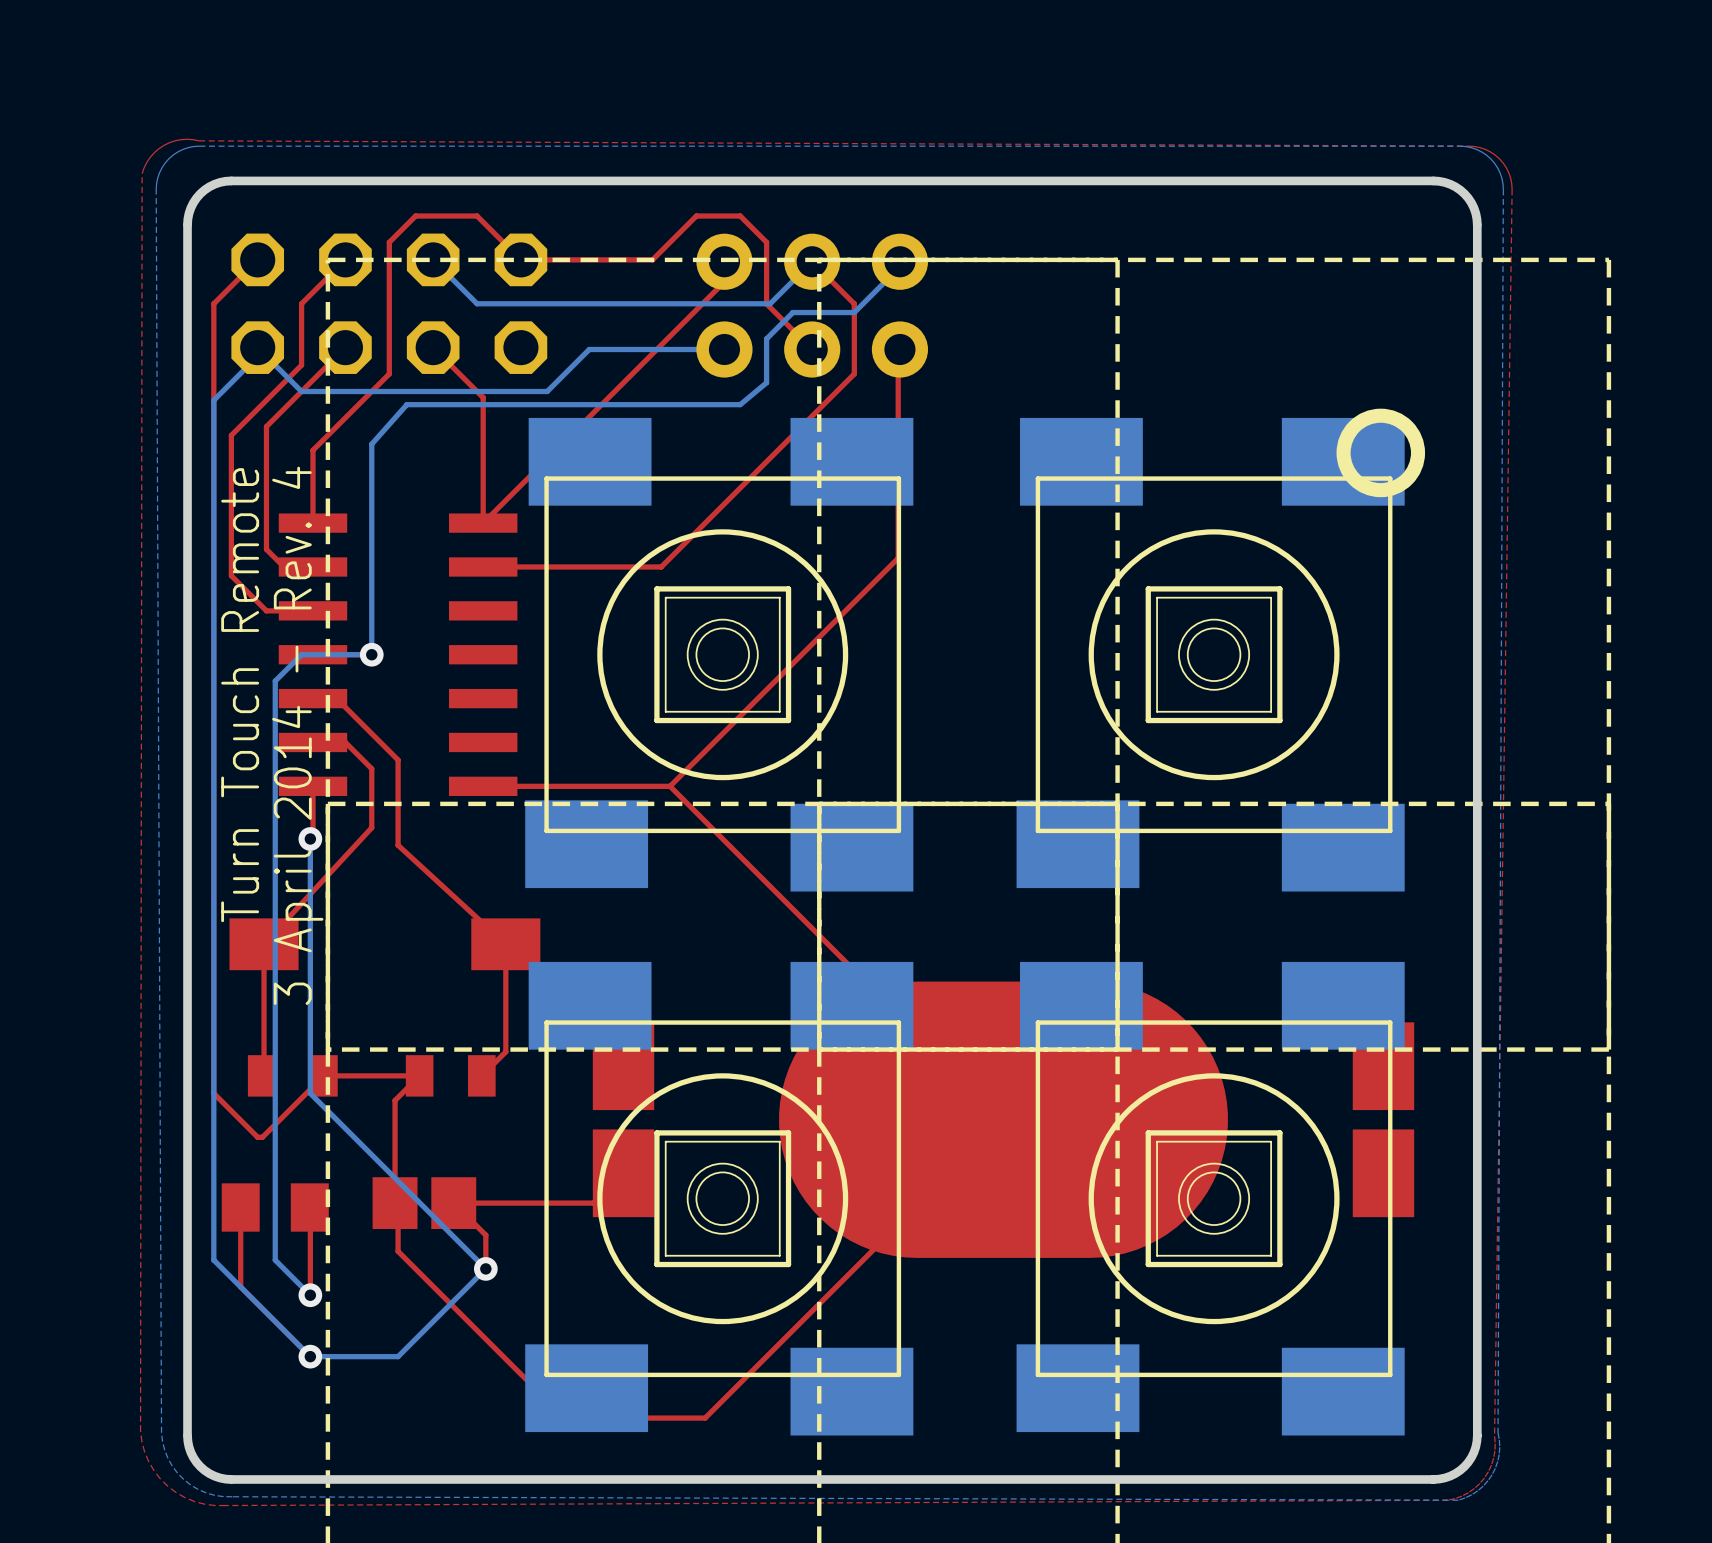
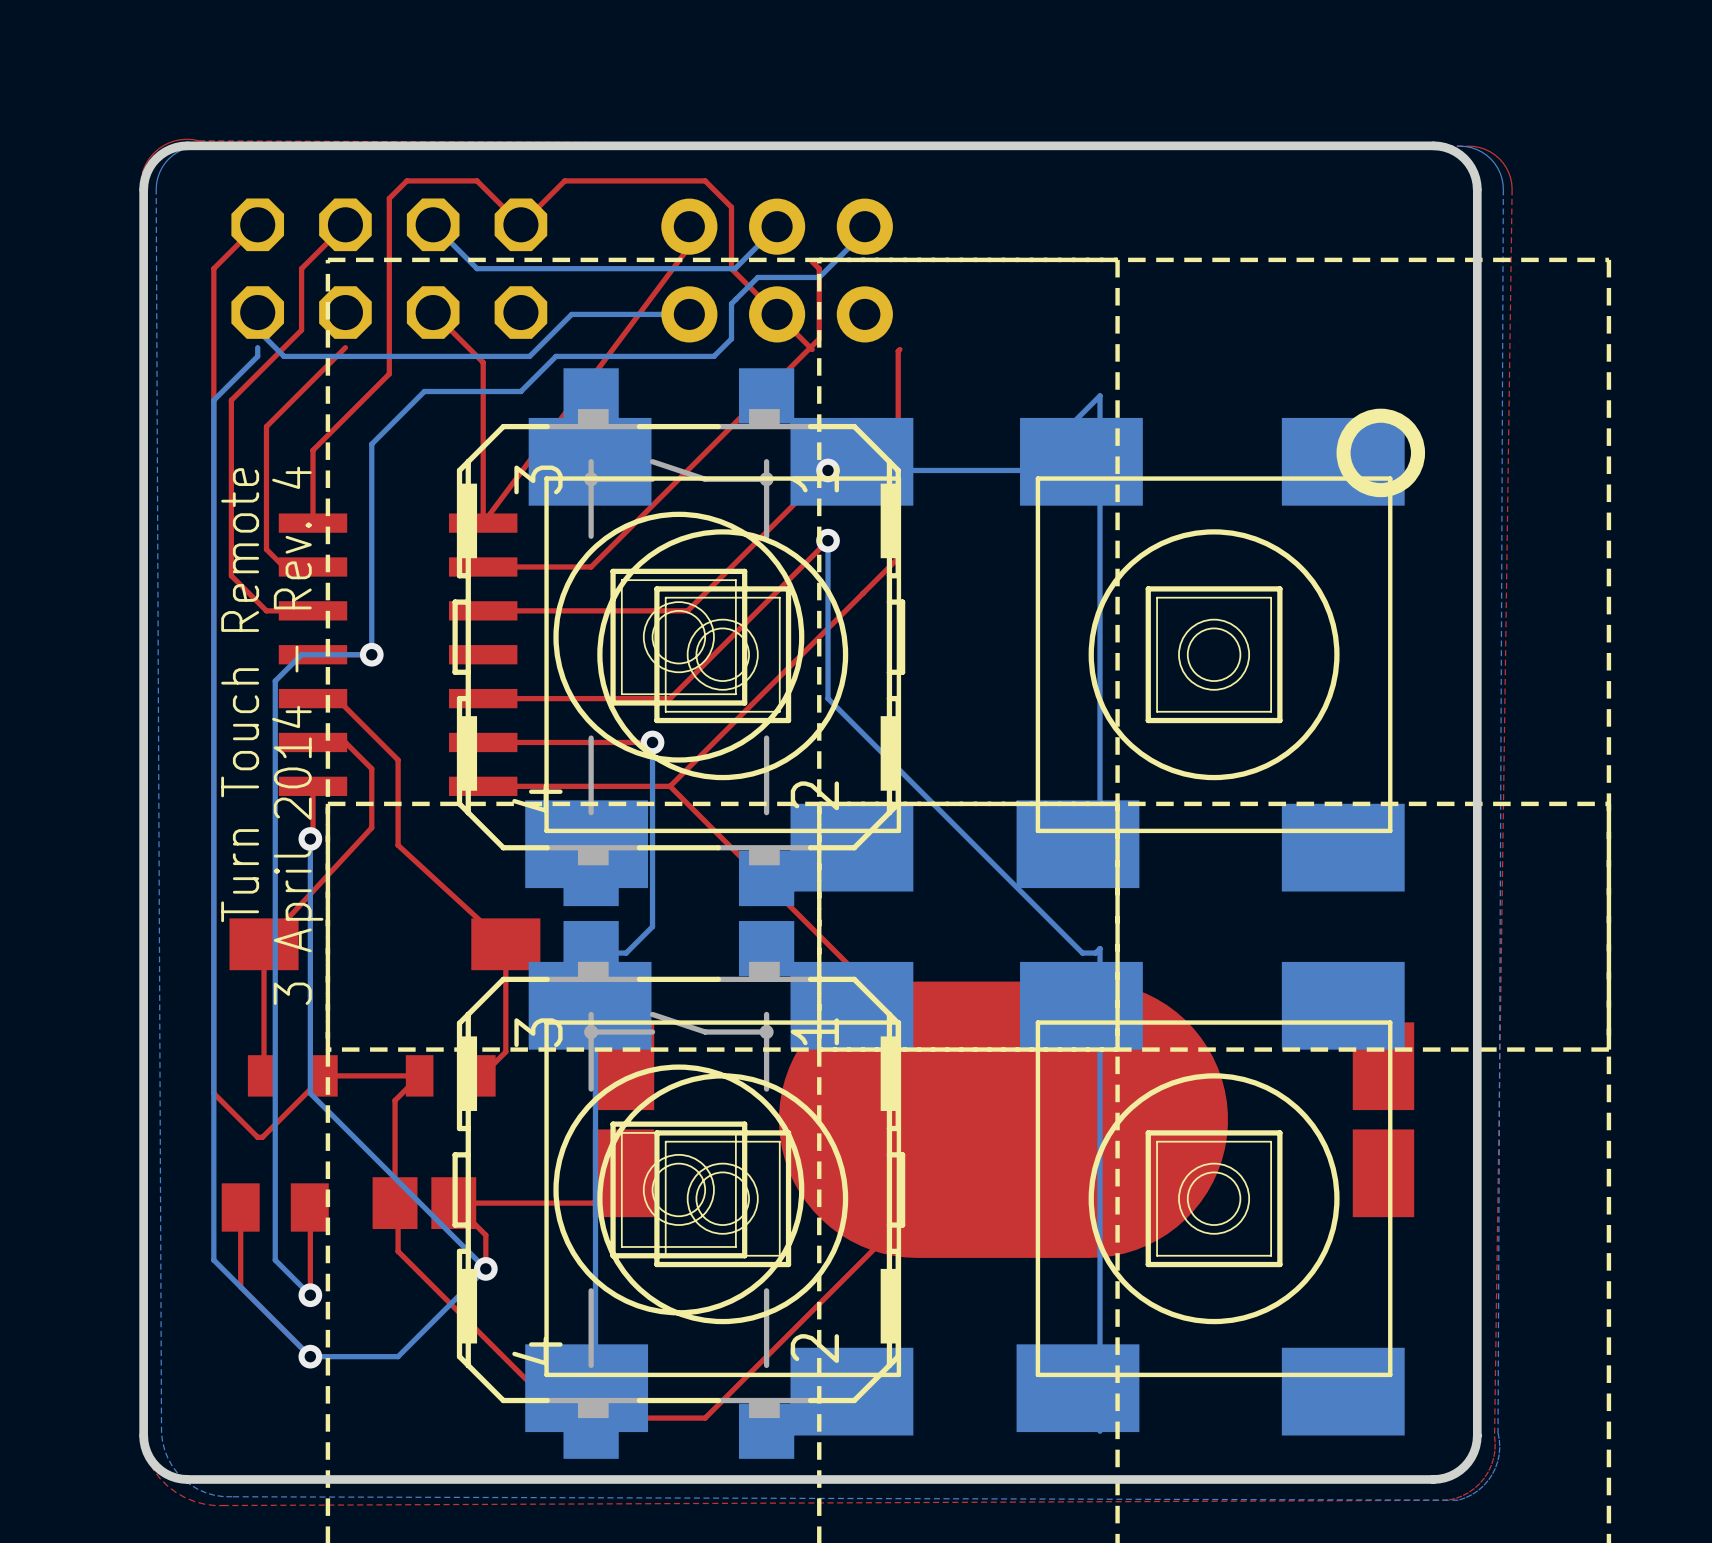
bottom track: none -> (433, 224) (477, 268) (735, 268) (777, 226)
board edge: (1477, 224) (1473, 208) (1464, 193) (1450, 184) (1433, 180) (231, 180) (214, 184) (200, 193) (190, 208) (187, 224) (187, 1435) (190, 1452) (200, 1466) (214, 1476) (231, 1479) -> (1477, 224) (1476, 183) (1471, 167) (1455, 151) (1433, 145) (187, 145) (170, 149) (156, 158) (146, 172) (143, 189) (143, 1435) (149, 1457) (165, 1473) (181, 1479) (231, 1479)
top track: (389, 242) (415, 216) (477, 216) (520, 259) (652, 259) (696, 216) (740, 216) (766, 242) (766, 303) -> (389, 242) (389, 198) (406, 180) (477, 180) (520, 224) (564, 180) (705, 180) (731, 207) (731, 268) (766, 303)
top track: (257, 259) (213, 303) -> (257, 224) (213, 268) (213, 303)
top track: (345, 259) (301, 303) -> (345, 224) (301, 268) (301, 303)
bottom track: (433, 259) (477, 303) (770, 303) (812, 261) -> none
top track: (724, 261) (724, 281) (483, 523) -> (689, 226) (689, 246) (483, 523)
bottom track: (899, 261) (899, 266) (854, 312) (792, 312) (766, 338) (766, 382) (740, 404) (406, 404) (371, 444) -> none
top track: (819, 268) (854, 303) (854, 373) (661, 566) (591, 566) -> (819, 268) (819, 338) (591, 566)
part position: (389, 303) -> (389, 268)
part position: (812, 305) -> (777, 270)
bottom track: none -> (689, 314) (571, 314) (529, 356) (284, 356) (257, 330)
top track: (301, 330) (301, 365) (231, 435) -> (301, 330) (231, 400) (231, 435)
bottom track: (257, 347) (301, 391) (424, 391) -> (371, 444) (424, 391)
top track: (433, 347) (483, 397) -> (433, 312) (483, 362) (483, 397)
bottom track: (724, 349) (589, 349) (547, 391) (520, 391) -> (864, 226) (864, 231) (819, 277) (757, 277) (731, 303) (731, 338) (713, 356) (556, 356) (520, 391)
top track: none -> (828, 470) (687, 610) (483, 610)
bottom track: none -> (828, 470) (1025, 470) (1100, 395) (1100, 878)
via: none -> (828, 470)
top track: none -> (828, 540) (670, 698) (483, 698)
bottom track: none -> (828, 540) (828, 698) (1082, 953) (1095, 953) (1100, 948) (1100, 1431)
via: none -> (828, 540)
part: none -> (678, 637)
top track: none -> (652, 742) (483, 742)
bottom track: none -> (652, 742) (652, 926) (626, 953) (595, 953)
via: none -> (652, 742)
bottom track: none -> (595, 953) (595, 1426) (591, 1431)
part: none -> (678, 1189)

